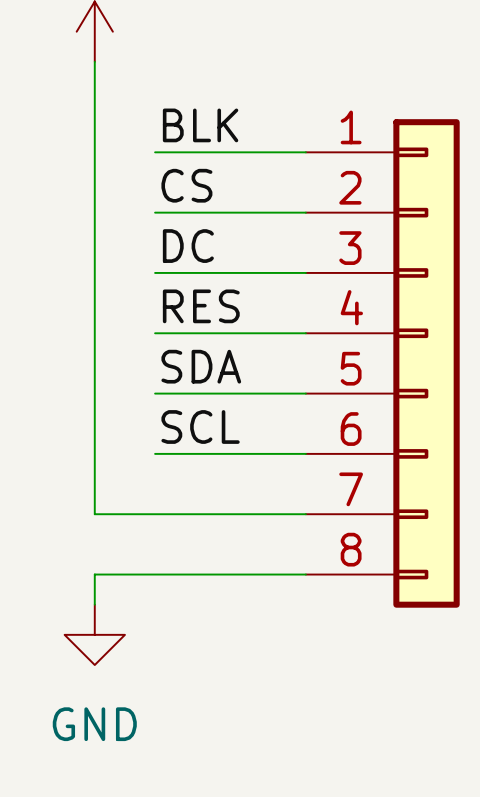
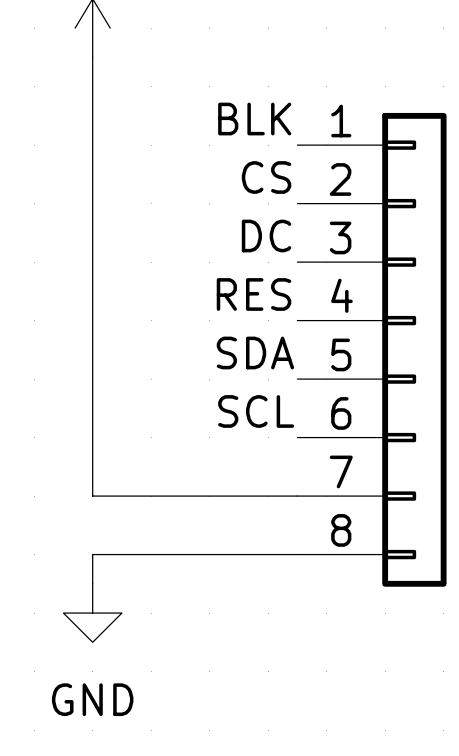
label position: BLK (200, 125) -> BLK (254, 119)
wire: (155, 152) (305, 152) -> none
label position: CS (186, 185) -> CS (266, 177)
wire: (155, 212) (305, 212) -> none
label position: DC (188, 246) -> DC (266, 236)
wire: (155, 272) (305, 272) -> none
label position: RES (201, 306) -> RES (254, 294)
wire: (155, 333) (305, 333) -> none
label position: SDA (201, 366) -> SDA (255, 352)
wire: (155, 393) (305, 393) -> none
label position: SCL (200, 426) -> SCL (256, 411)
wire: (155, 453) (305, 453) -> none

